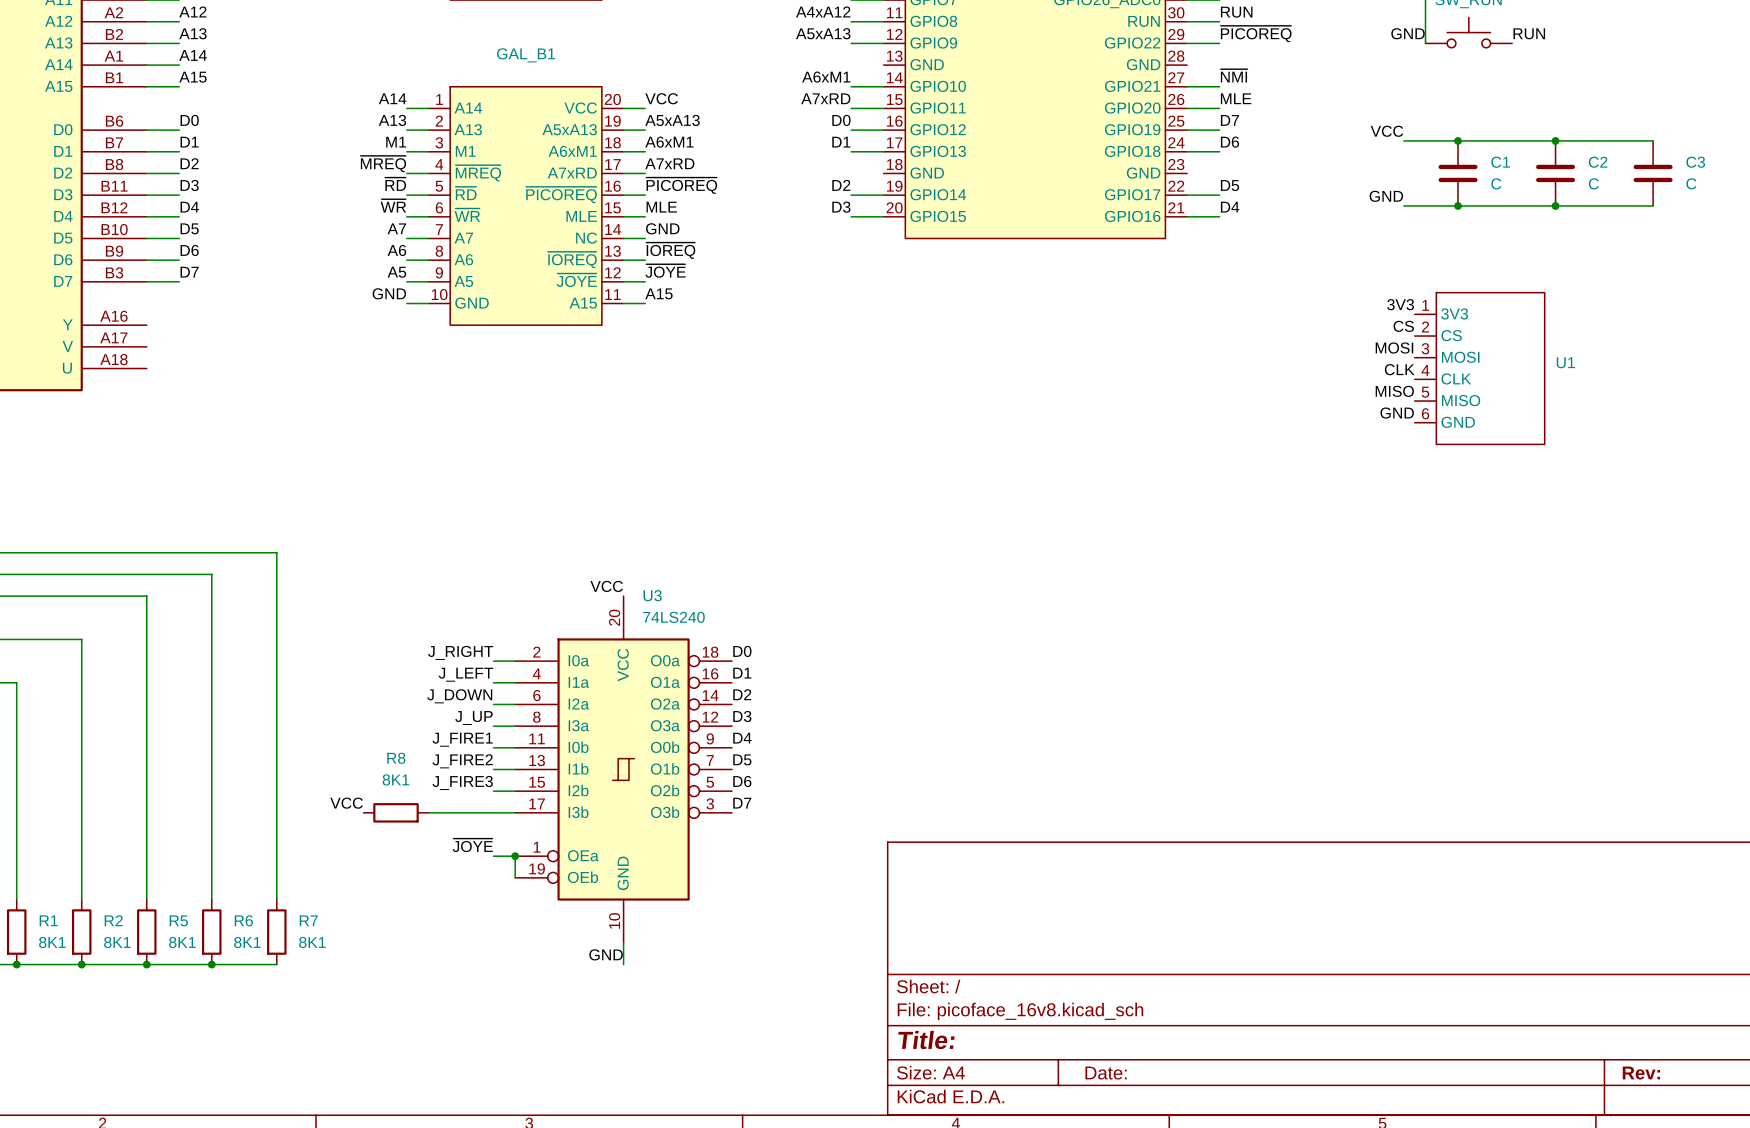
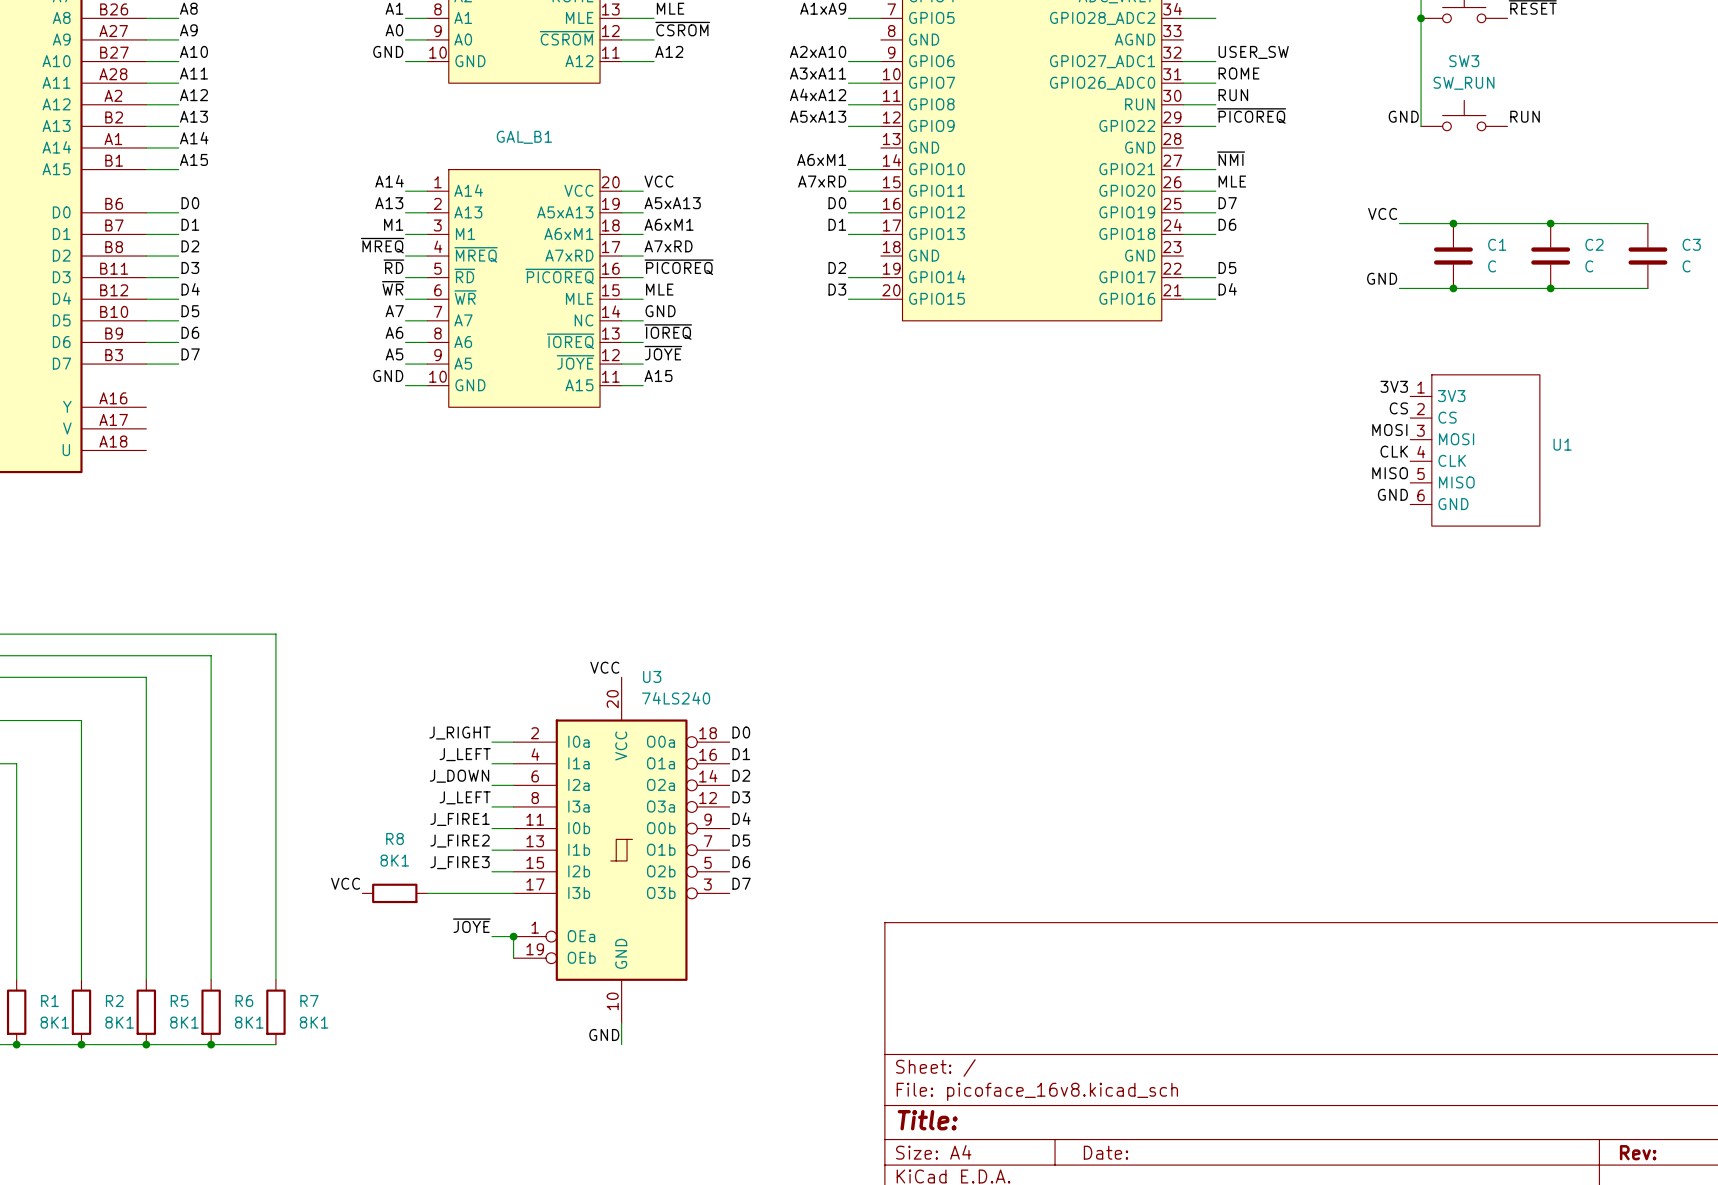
label: J_UP (473, 718) -> J_LEFT (465, 797)

